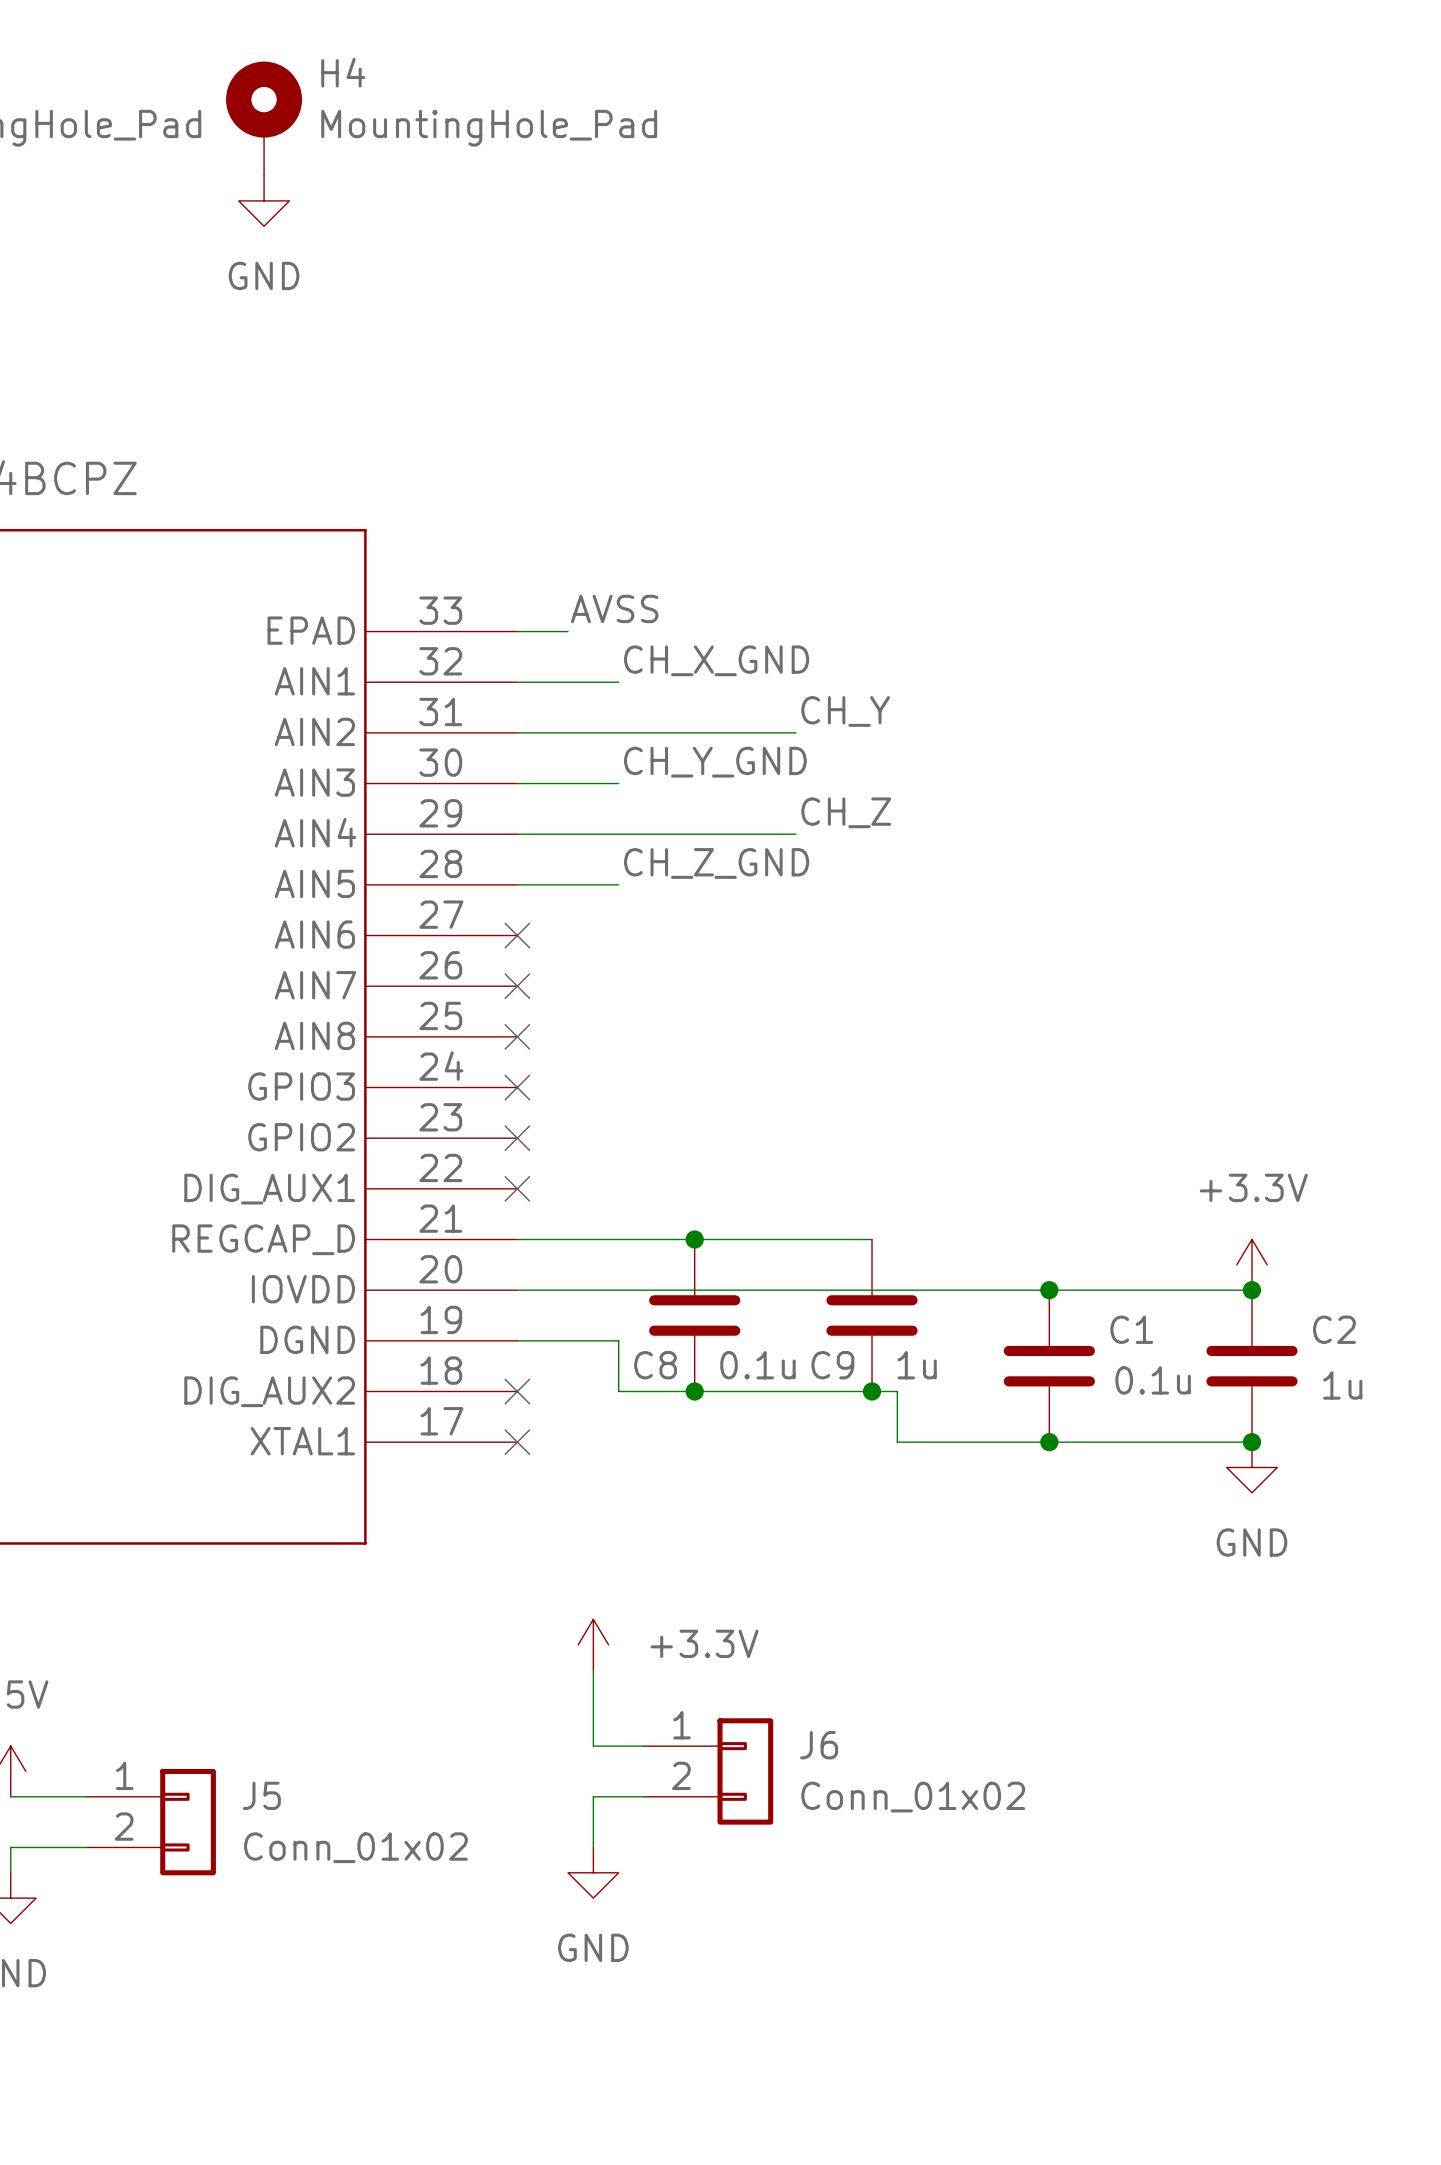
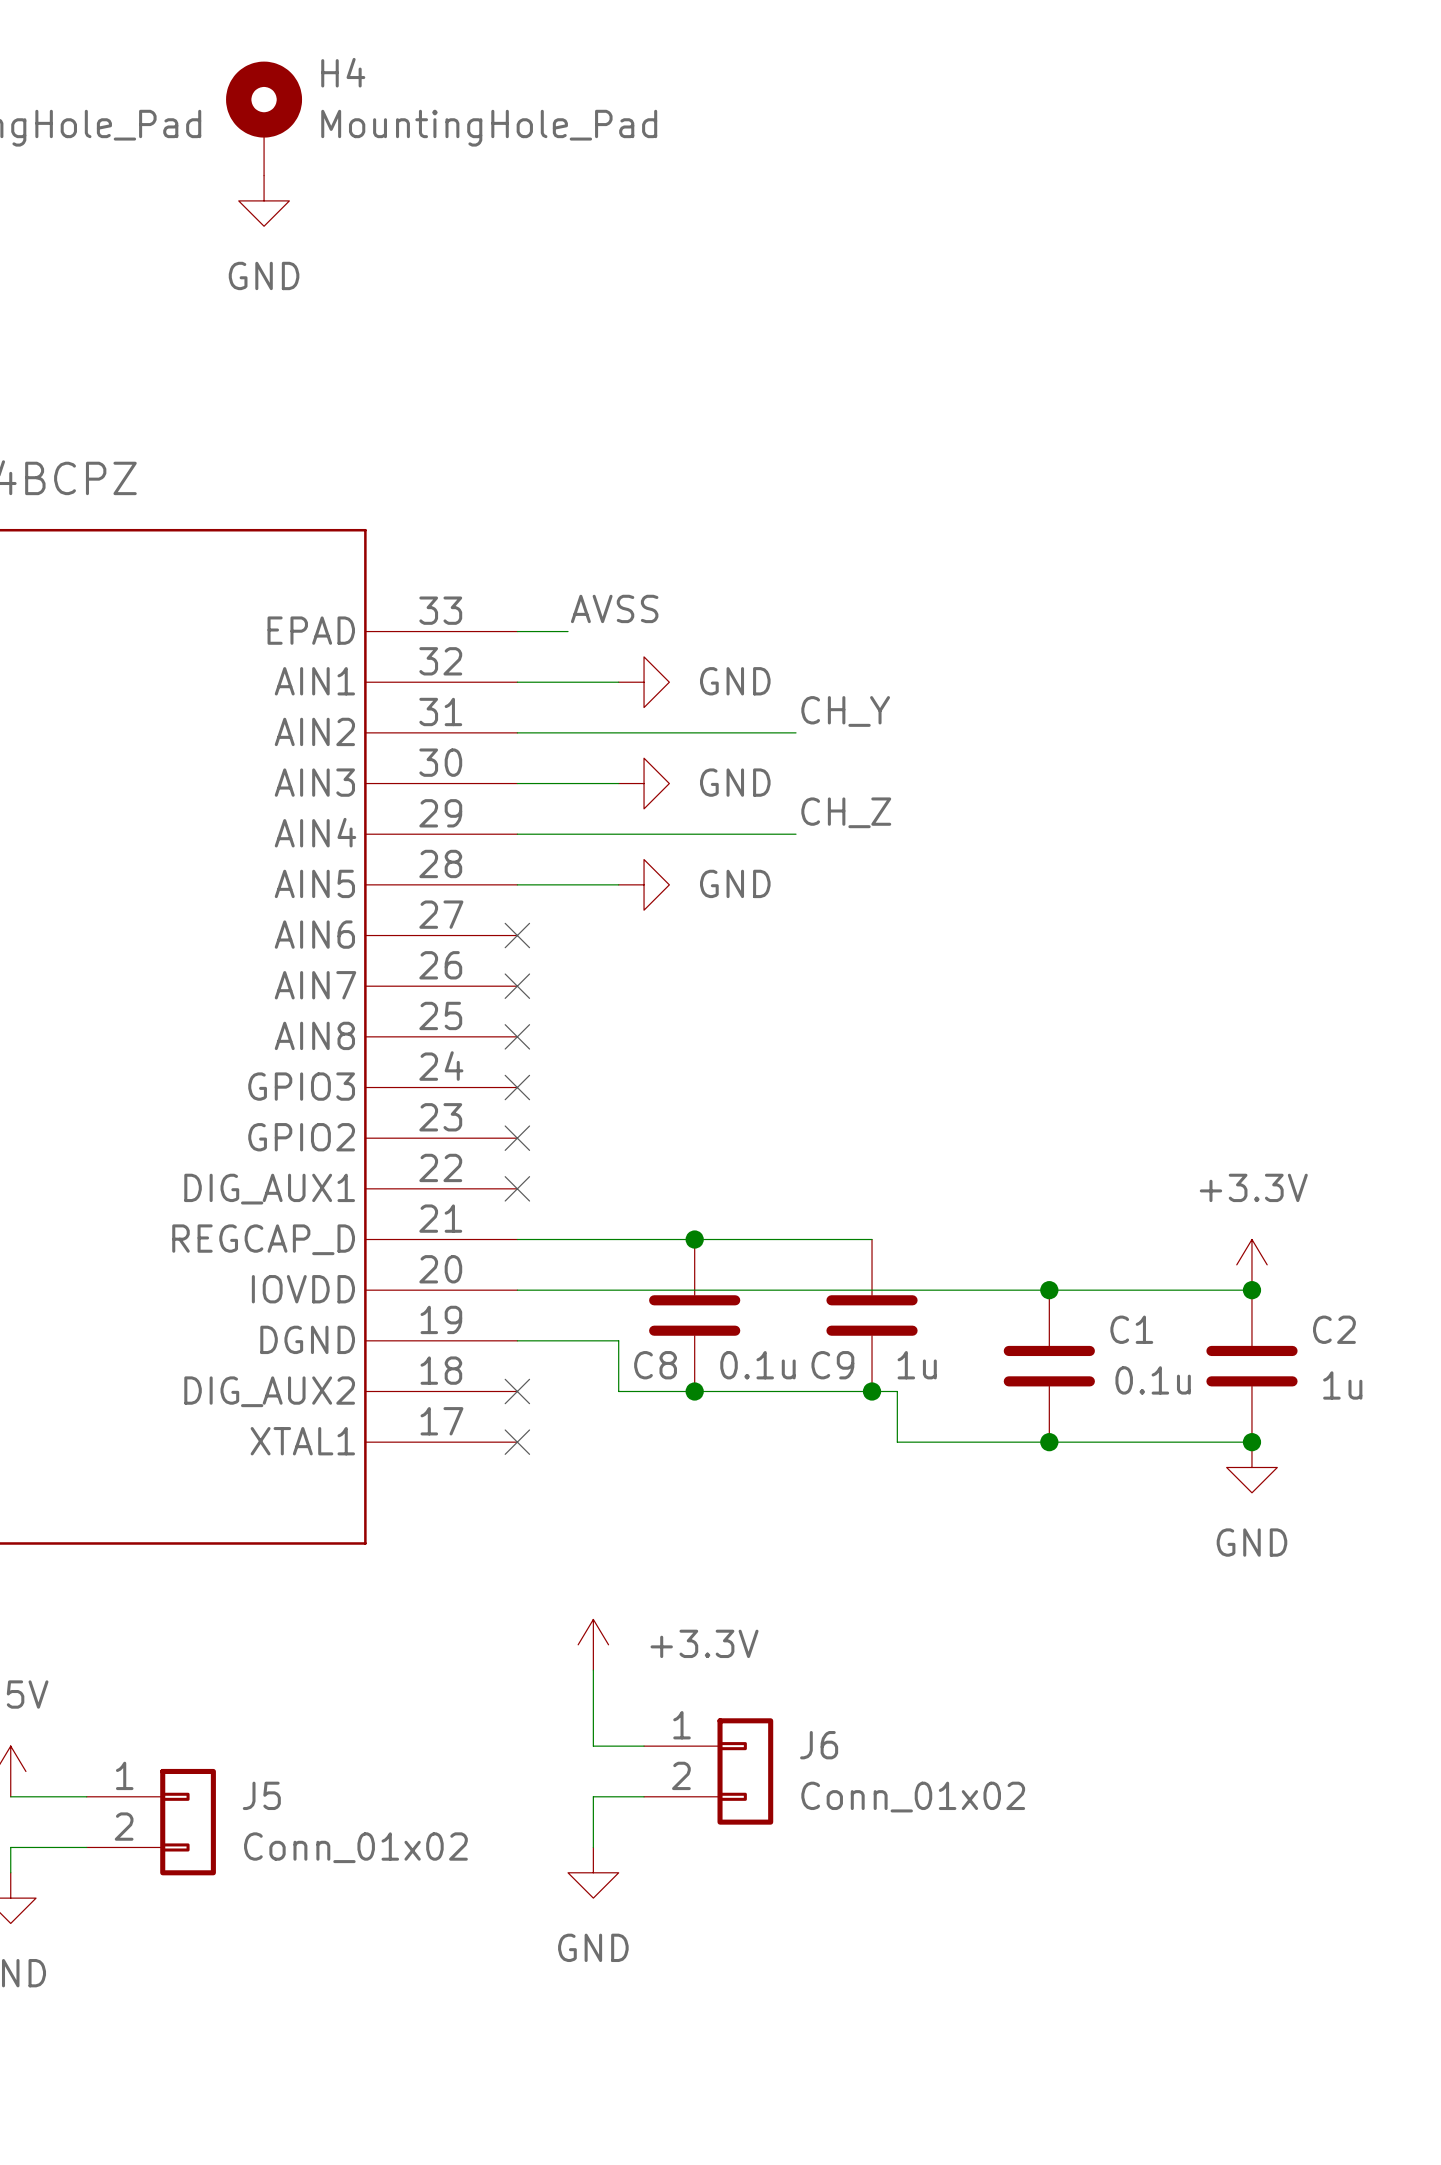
label: CH_X_GND (716, 660) -> none
power symbol: none -> GND (644, 682)
label: CH_Y_GND (715, 762) -> none
power symbol: none -> GND (644, 783)
label: CH_Z_GND (716, 863) -> none
power symbol: none -> GND (644, 884)

